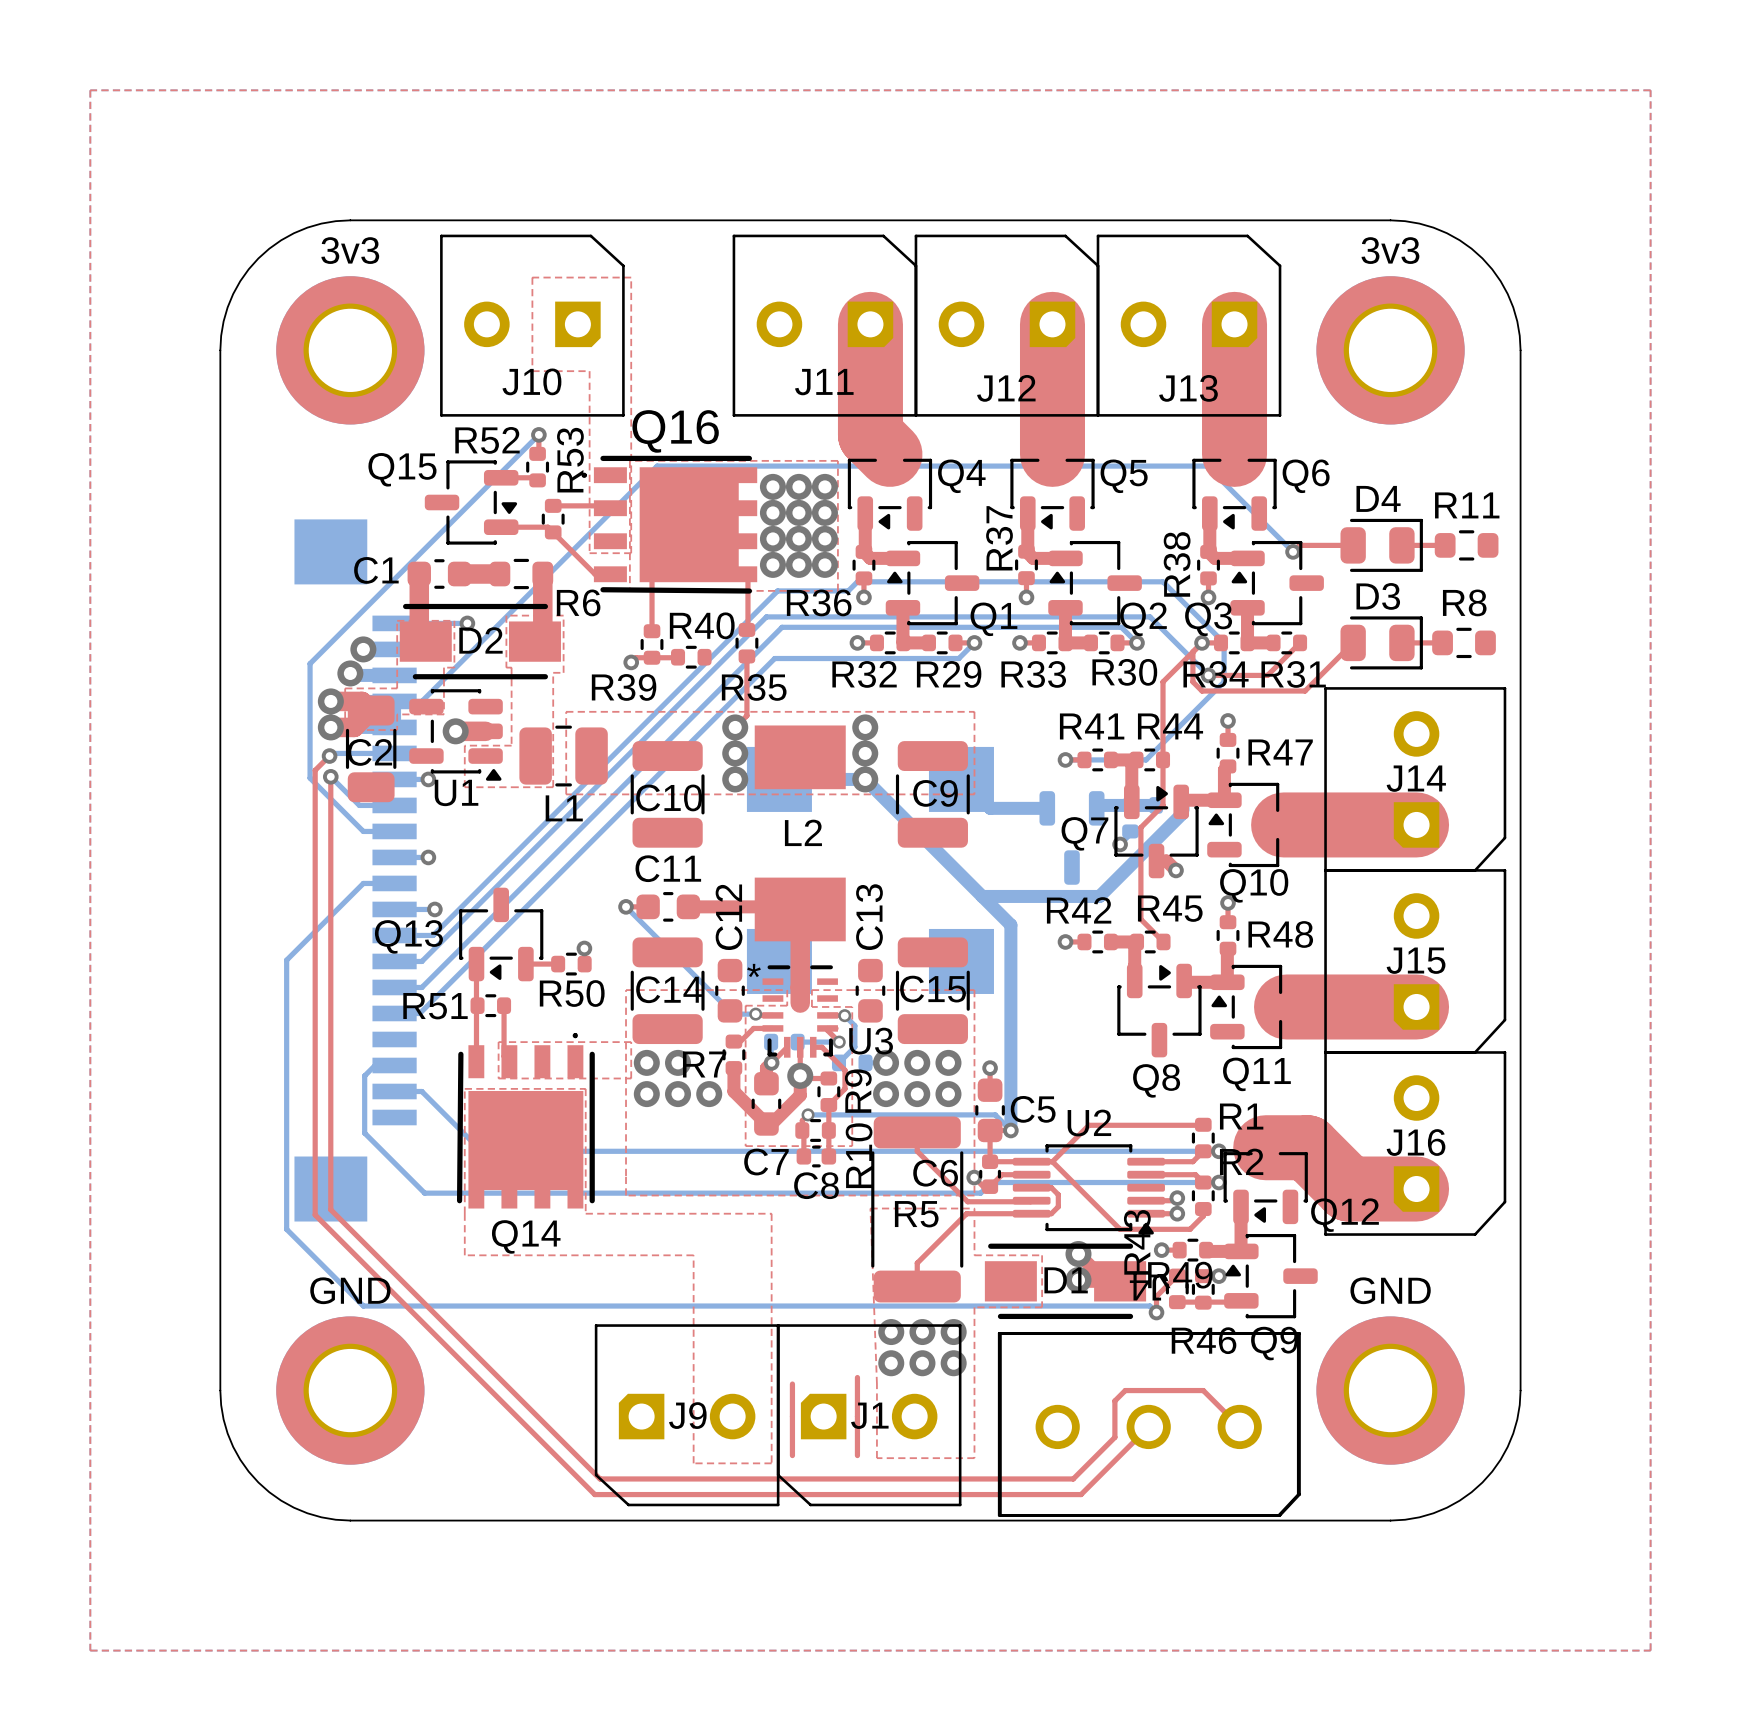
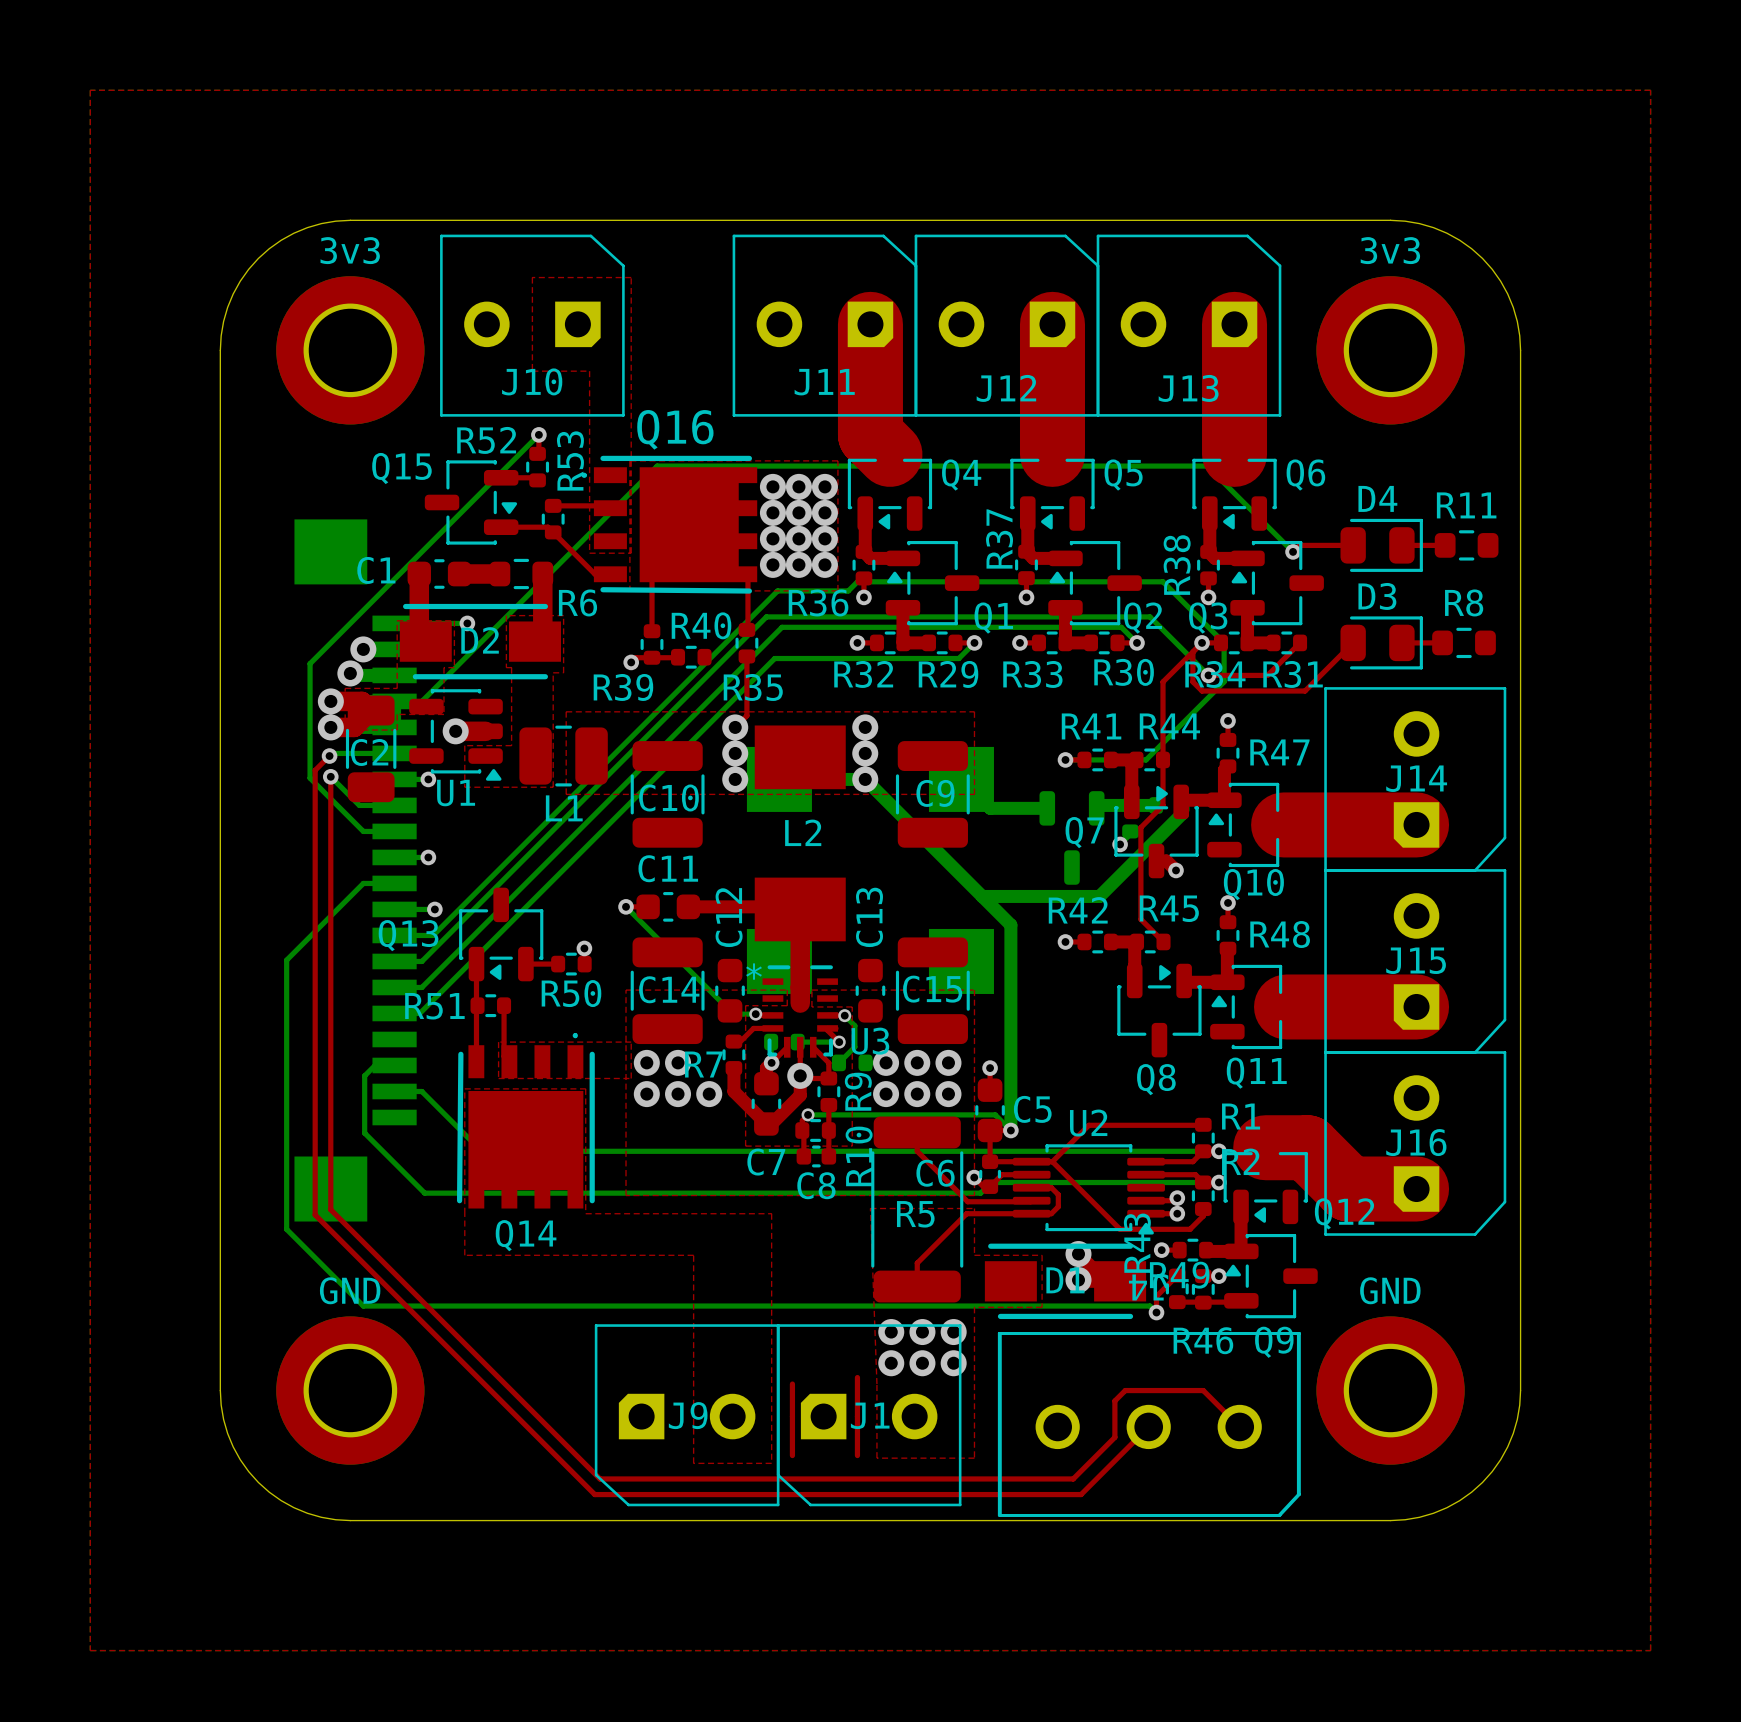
top track: (813, 1047) (822, 1047) (844, 1070) (844, 1088) (828, 1105) -> (813, 1047) (828, 1062) (828, 1078)

